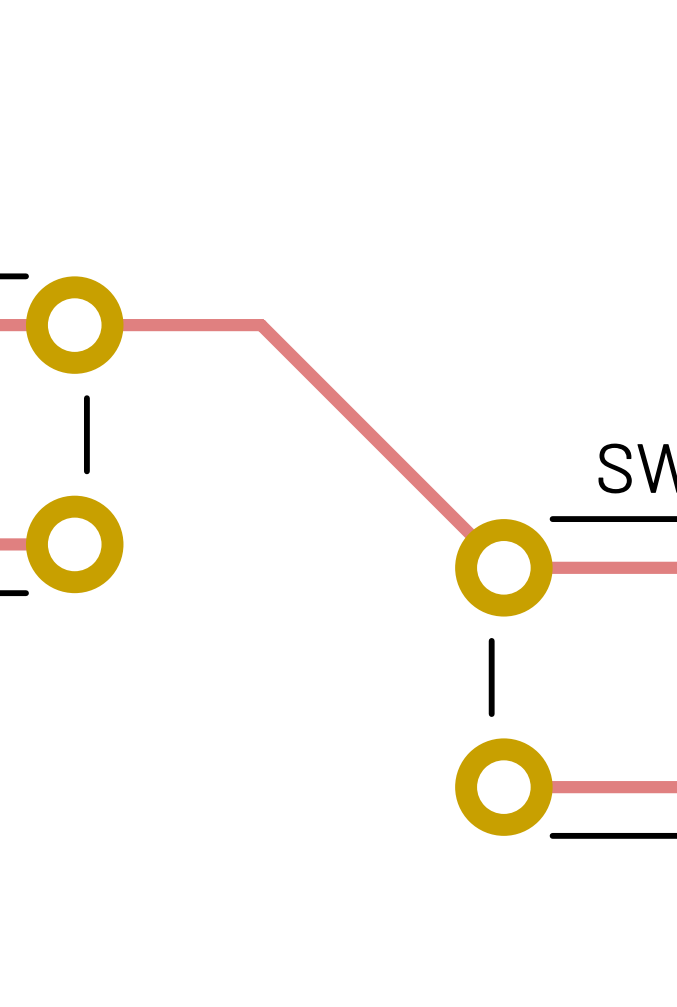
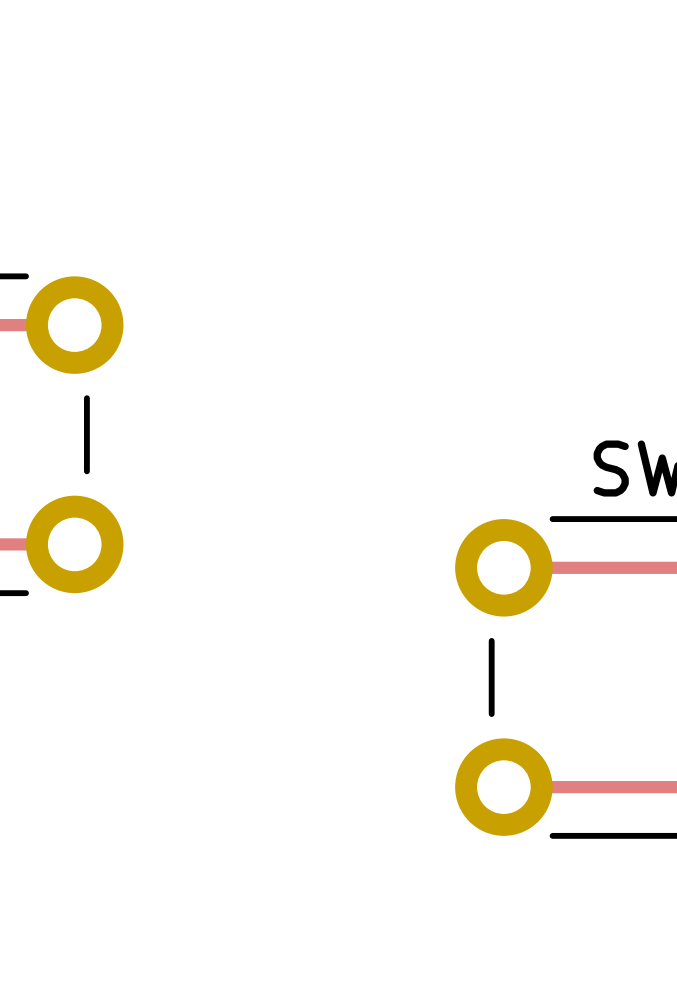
track: (74, 325) (261, 325) (503, 567) -> none

